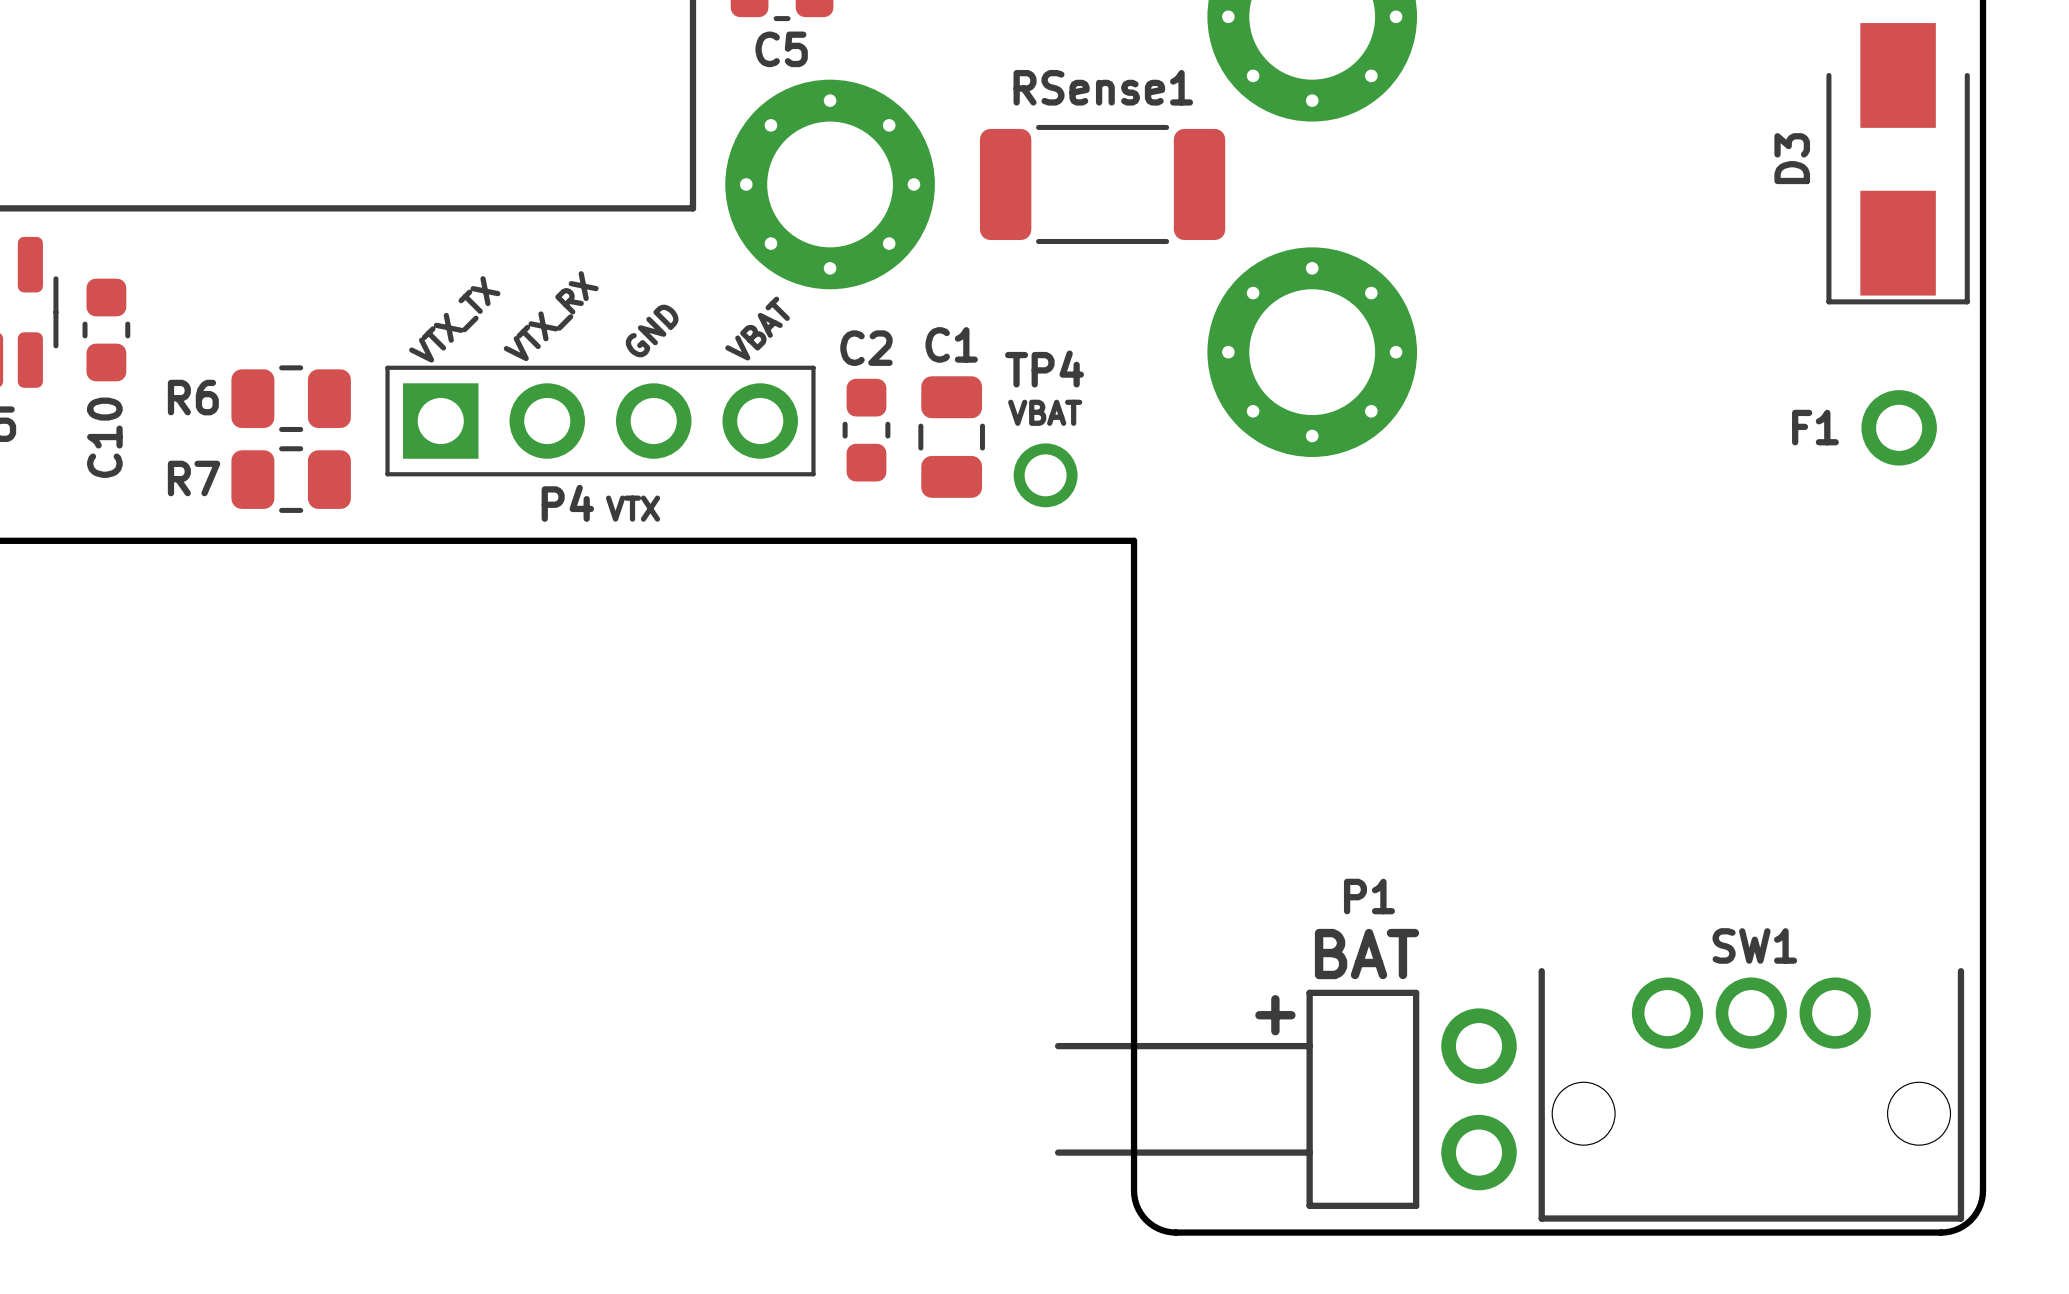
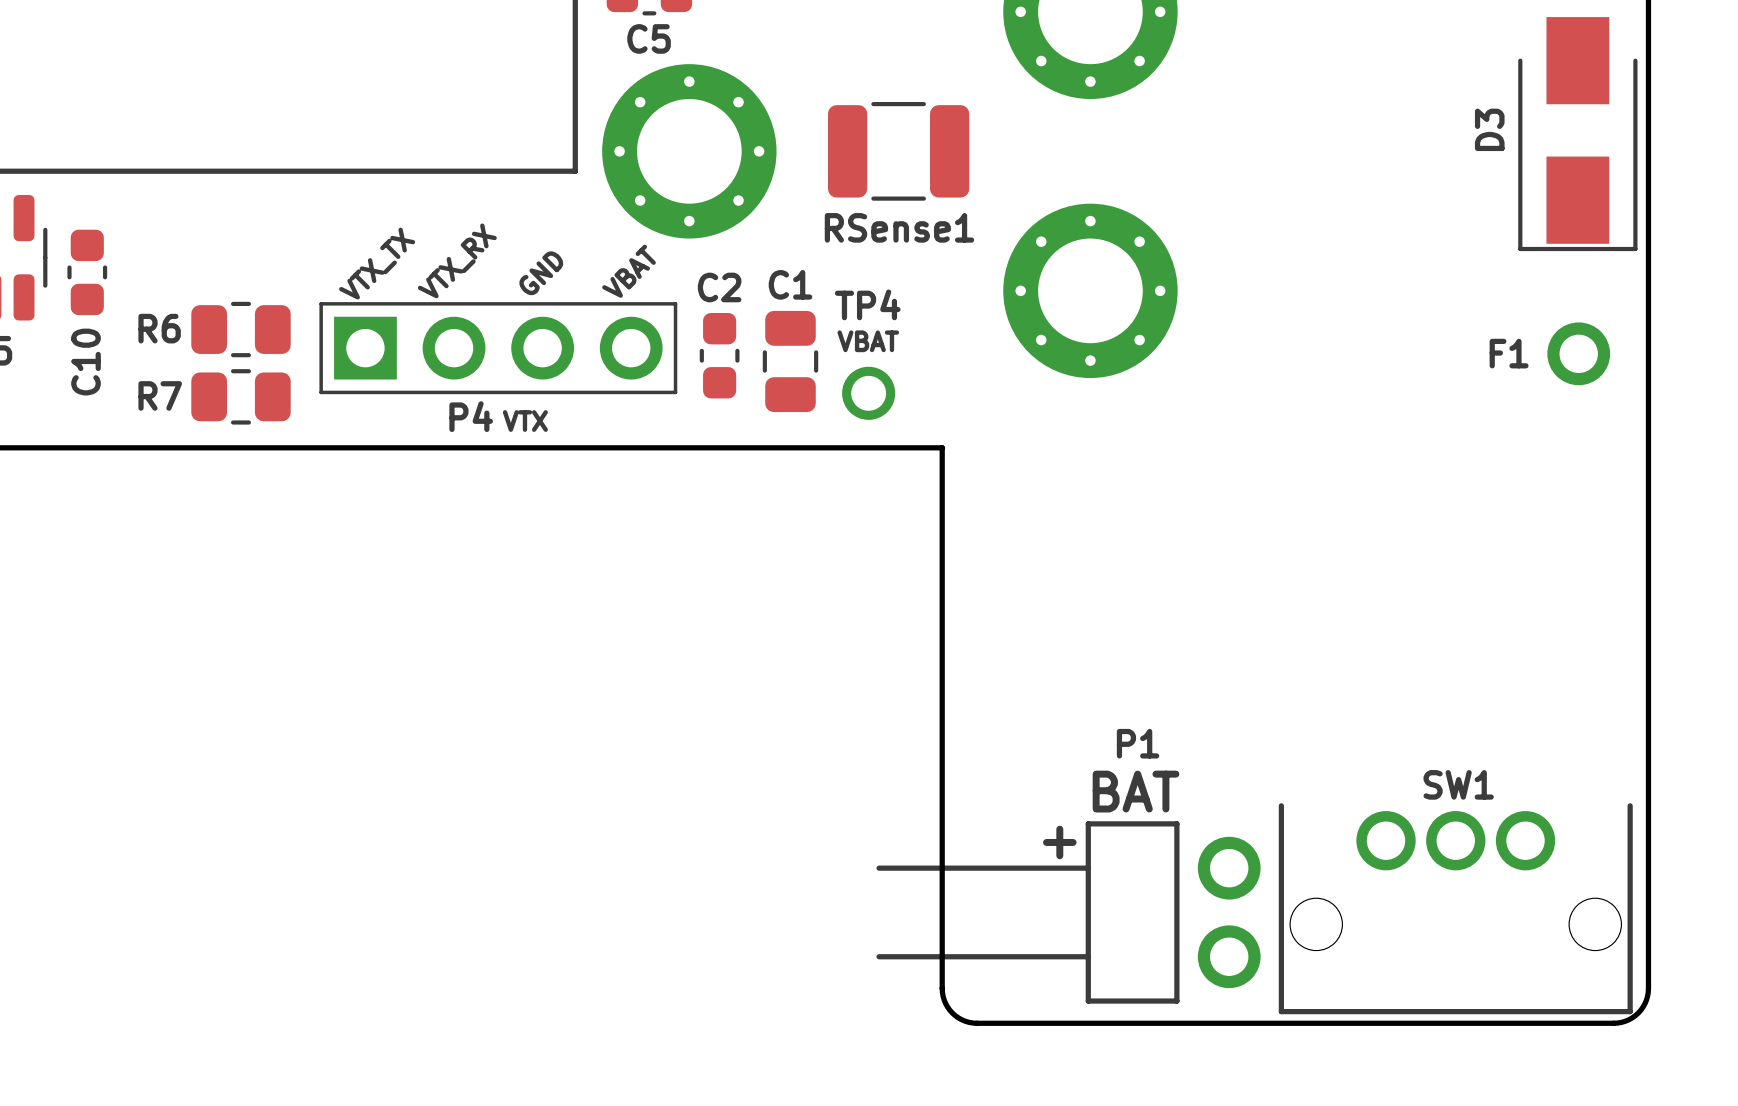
RSense1 name position: RSense1 (1103, 87) -> RSense1 (899, 227)
RSense1 footprint: [979, 124, 1226, 245] -> [827, 101, 970, 201]

